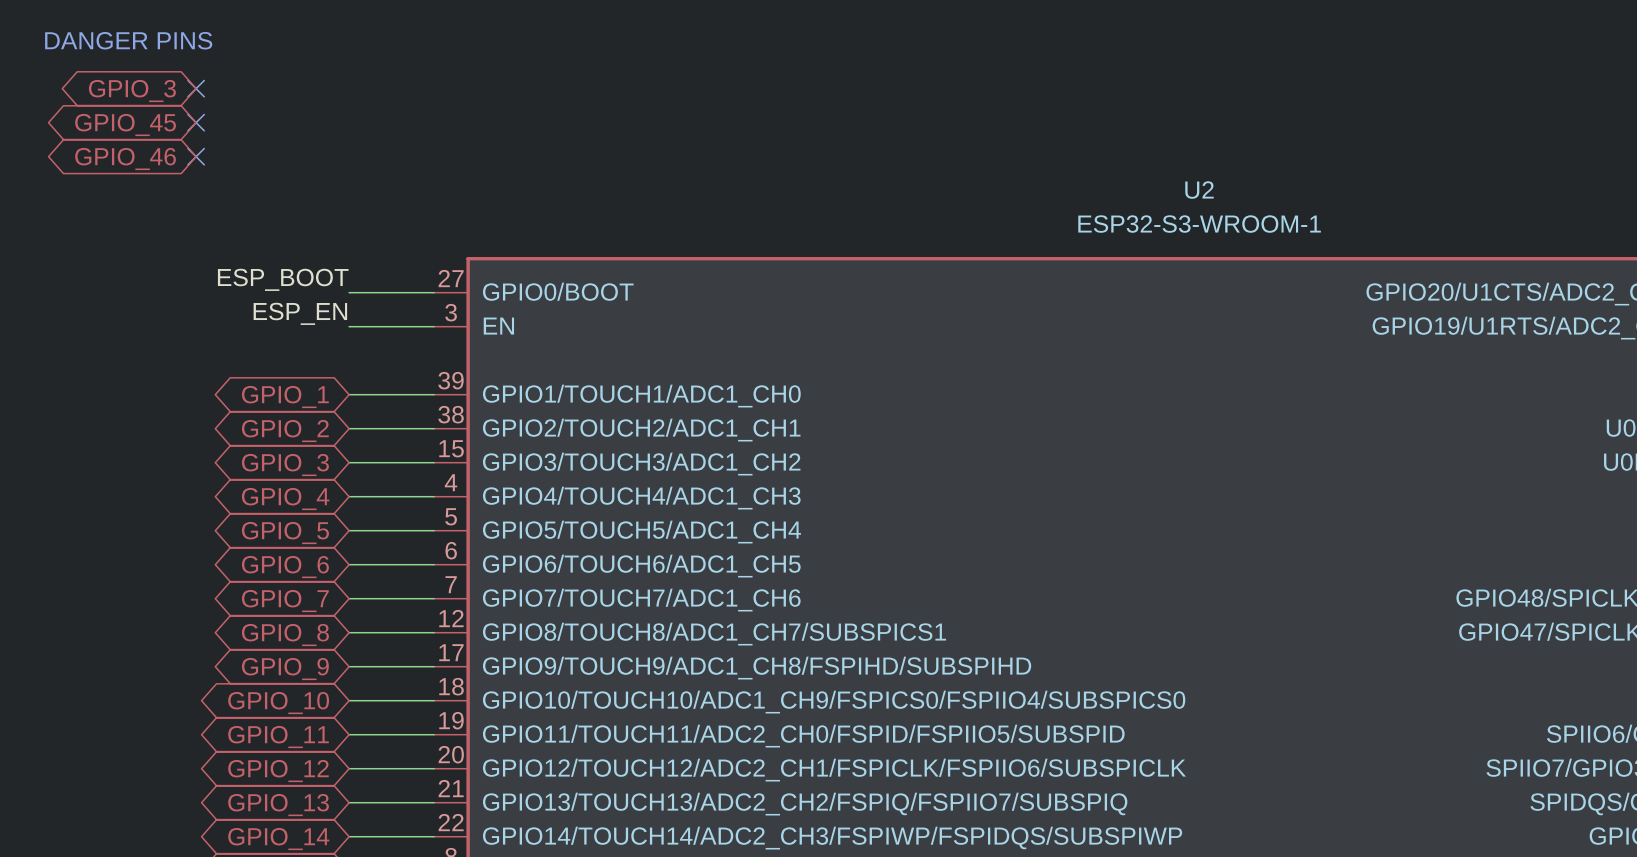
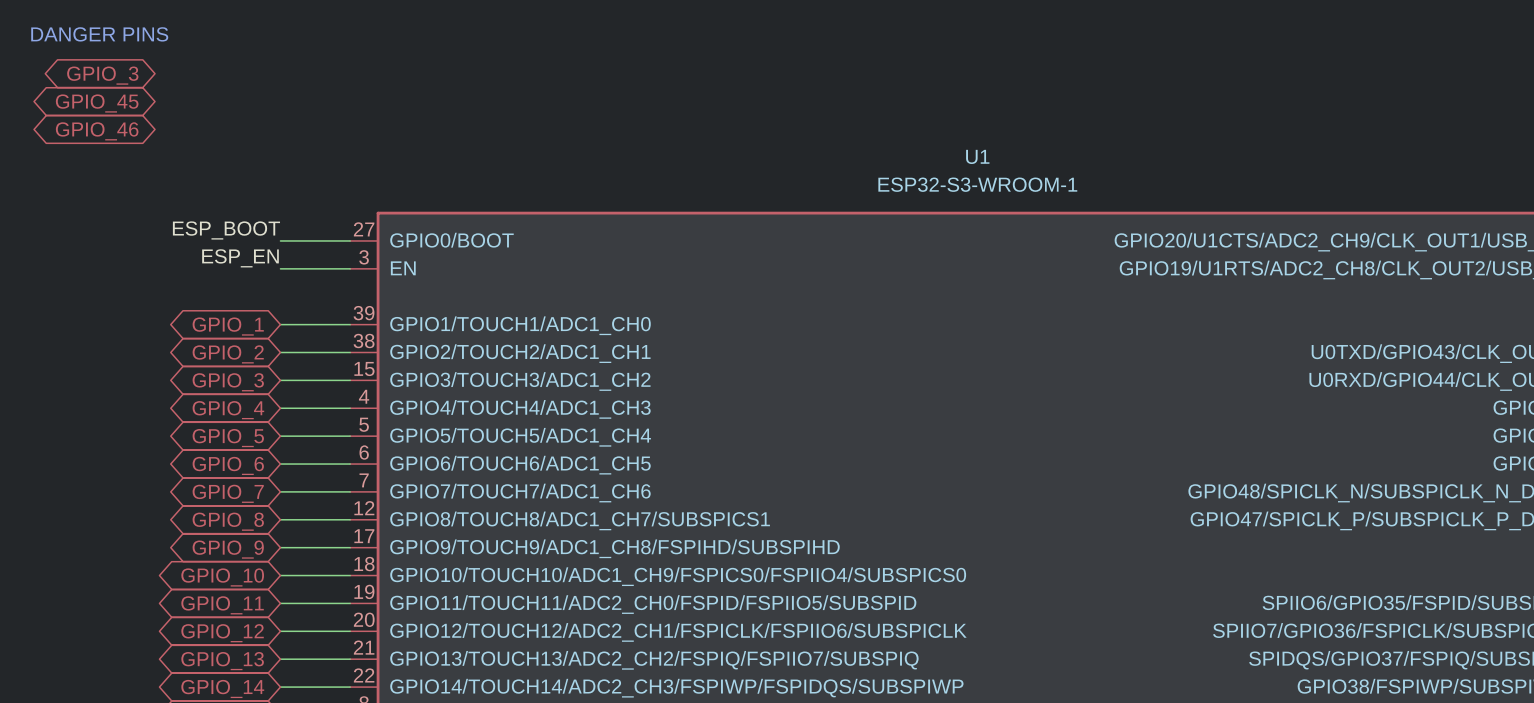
no-connect mark: (196, 88) -> none
no-connect mark: (196, 122) -> none
no-connect mark: (196, 156) -> none
U2 name: U2 (1199, 190) -> U1 (977, 156)

